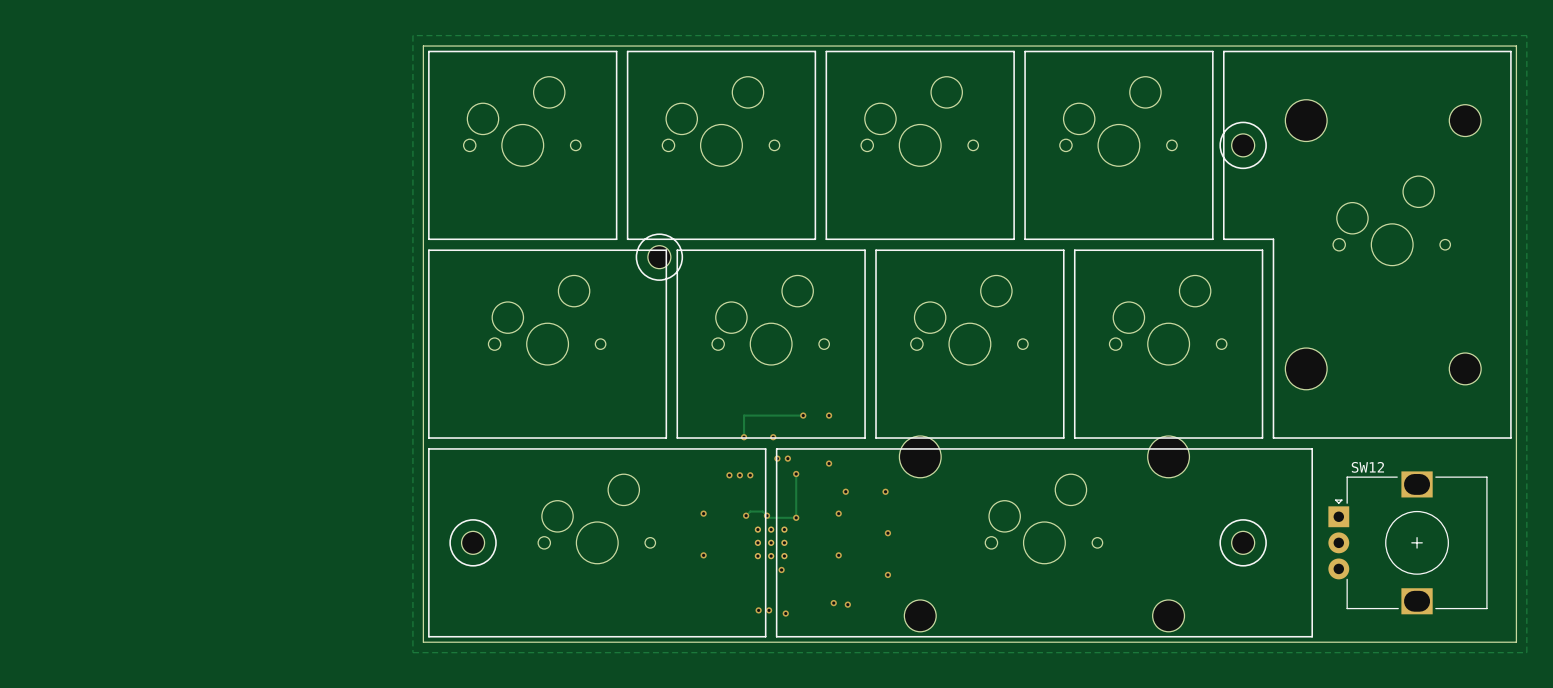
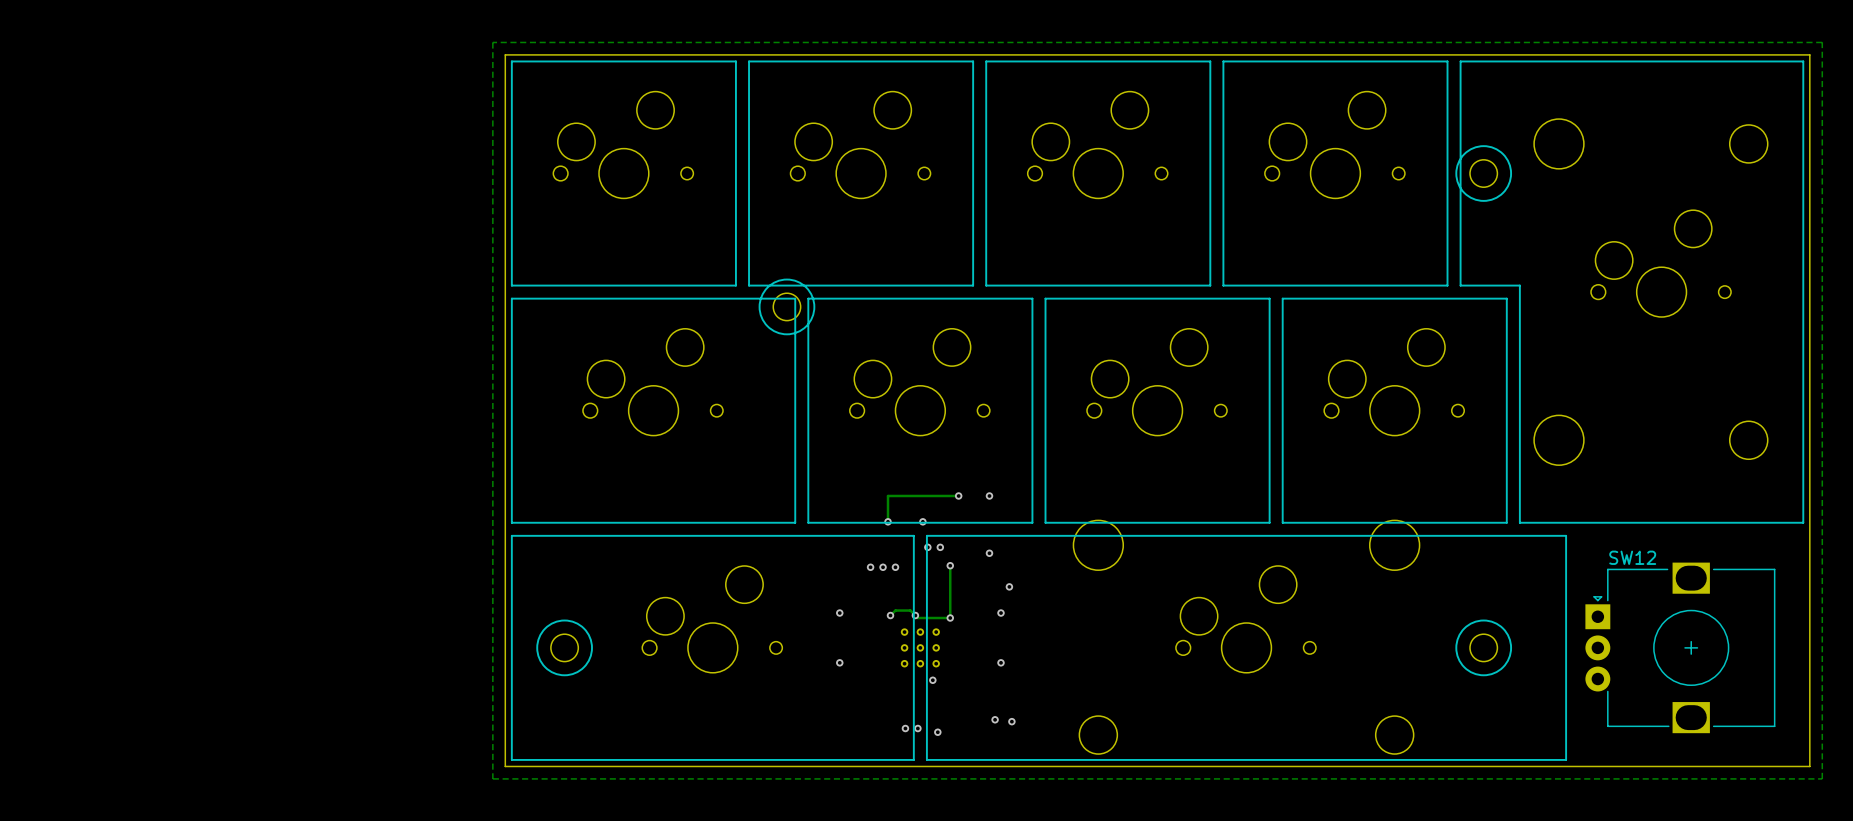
via: (885, 491) -> none
via: (887, 533) -> none
via: (887, 574) -> none

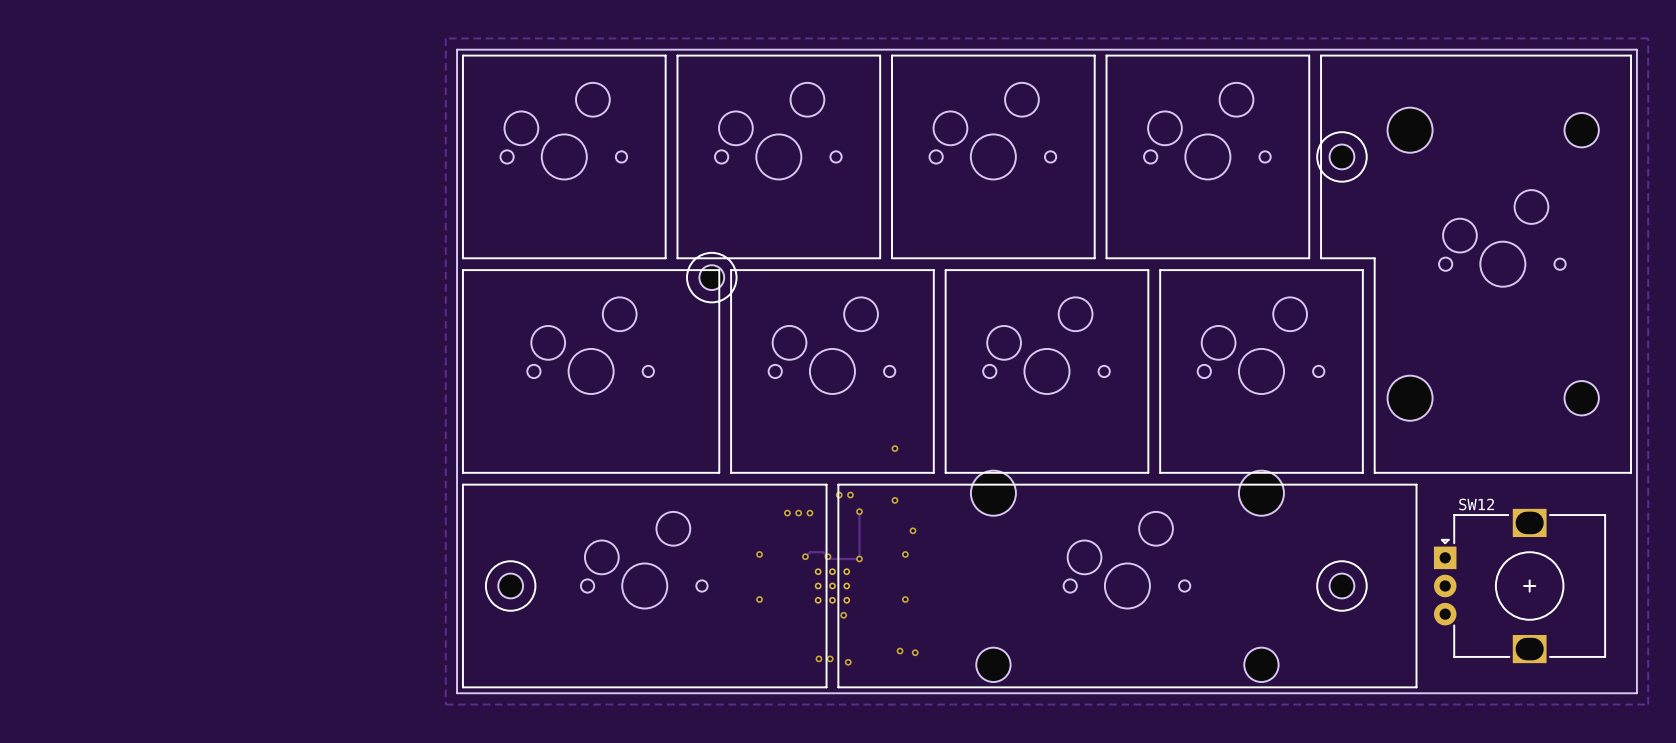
track: (958, 495) (888, 495) (888, 521) -> none
via: (958, 495) -> none
via: (888, 521) -> none
via: (922, 521) -> none

